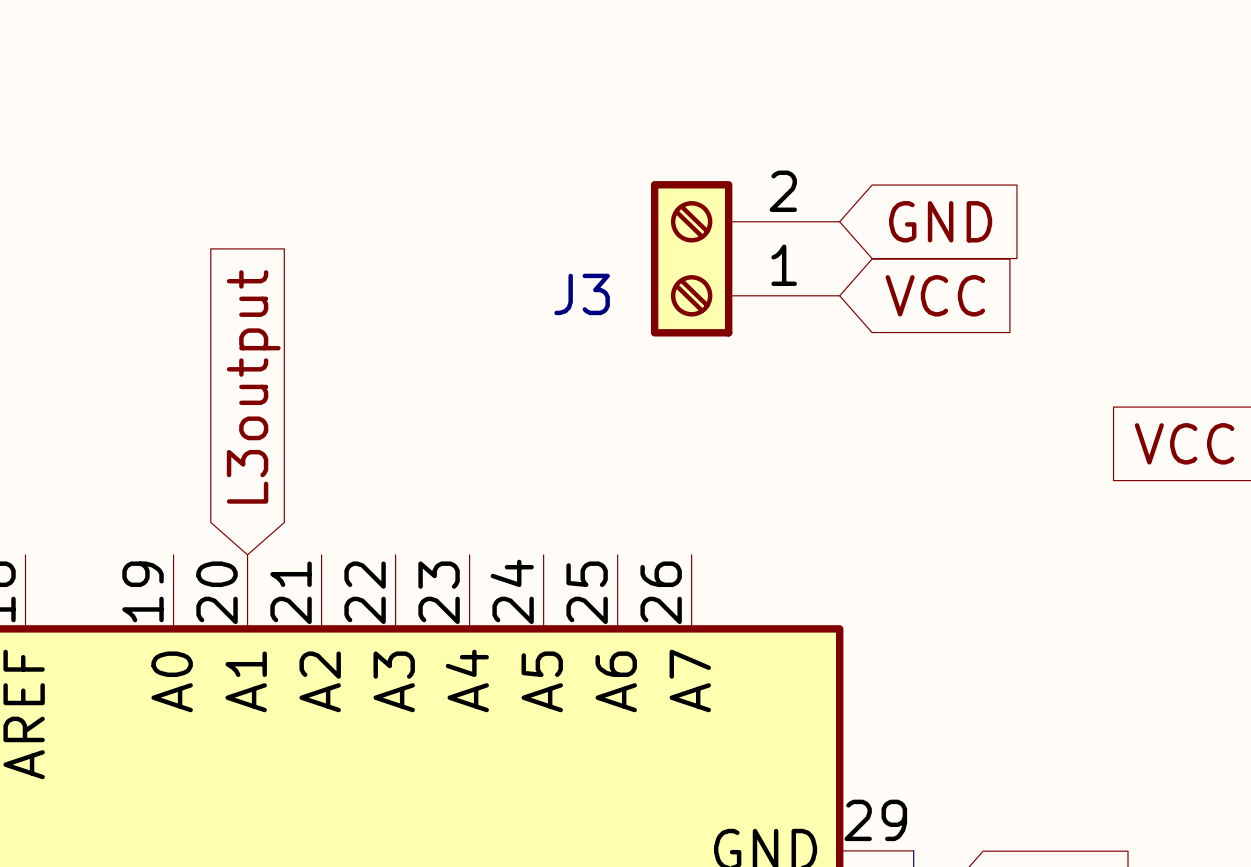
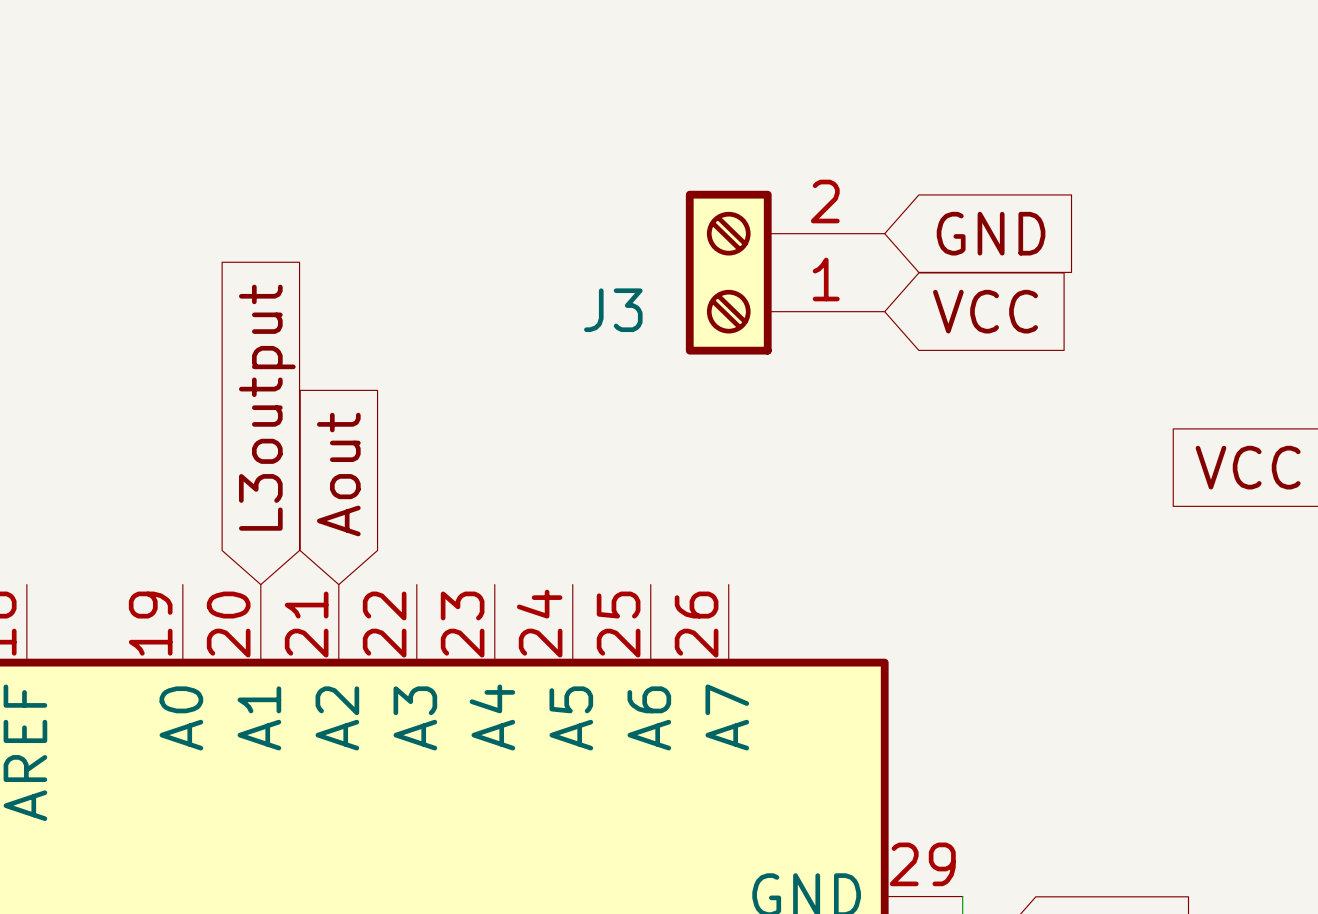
global label: none -> Aout (338, 474)

